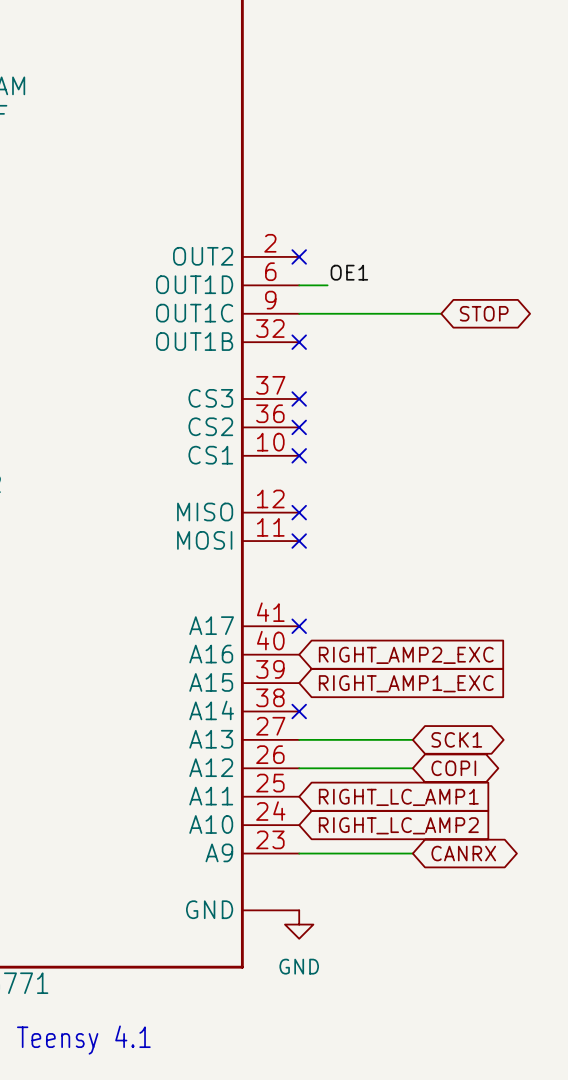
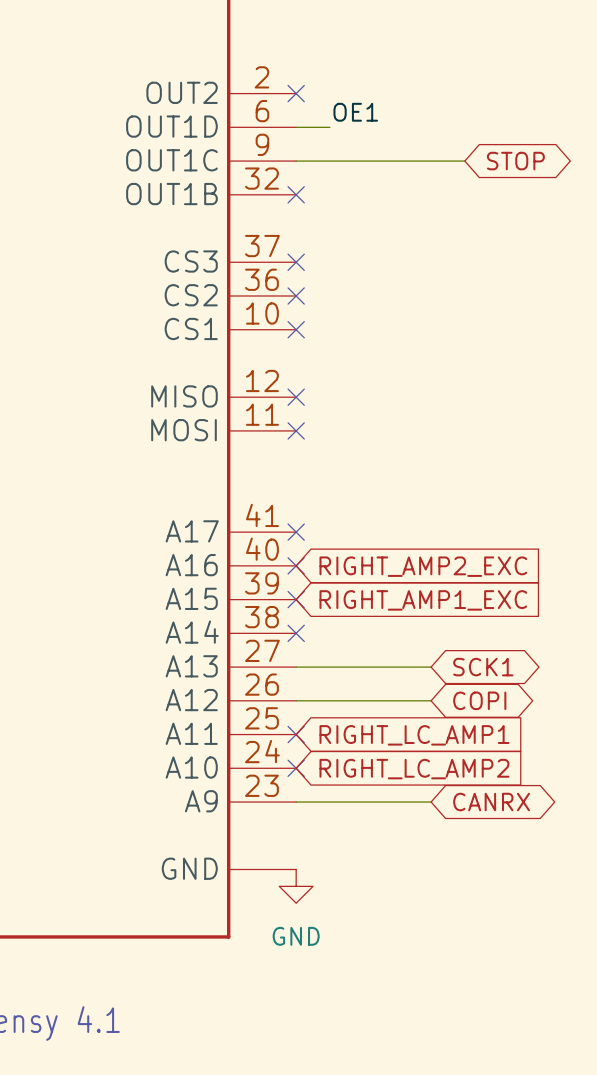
no-connect mark: none -> (296, 565)
no-connect mark: none -> (296, 599)
no-connect mark: none -> (296, 734)
no-connect mark: none -> (296, 768)

